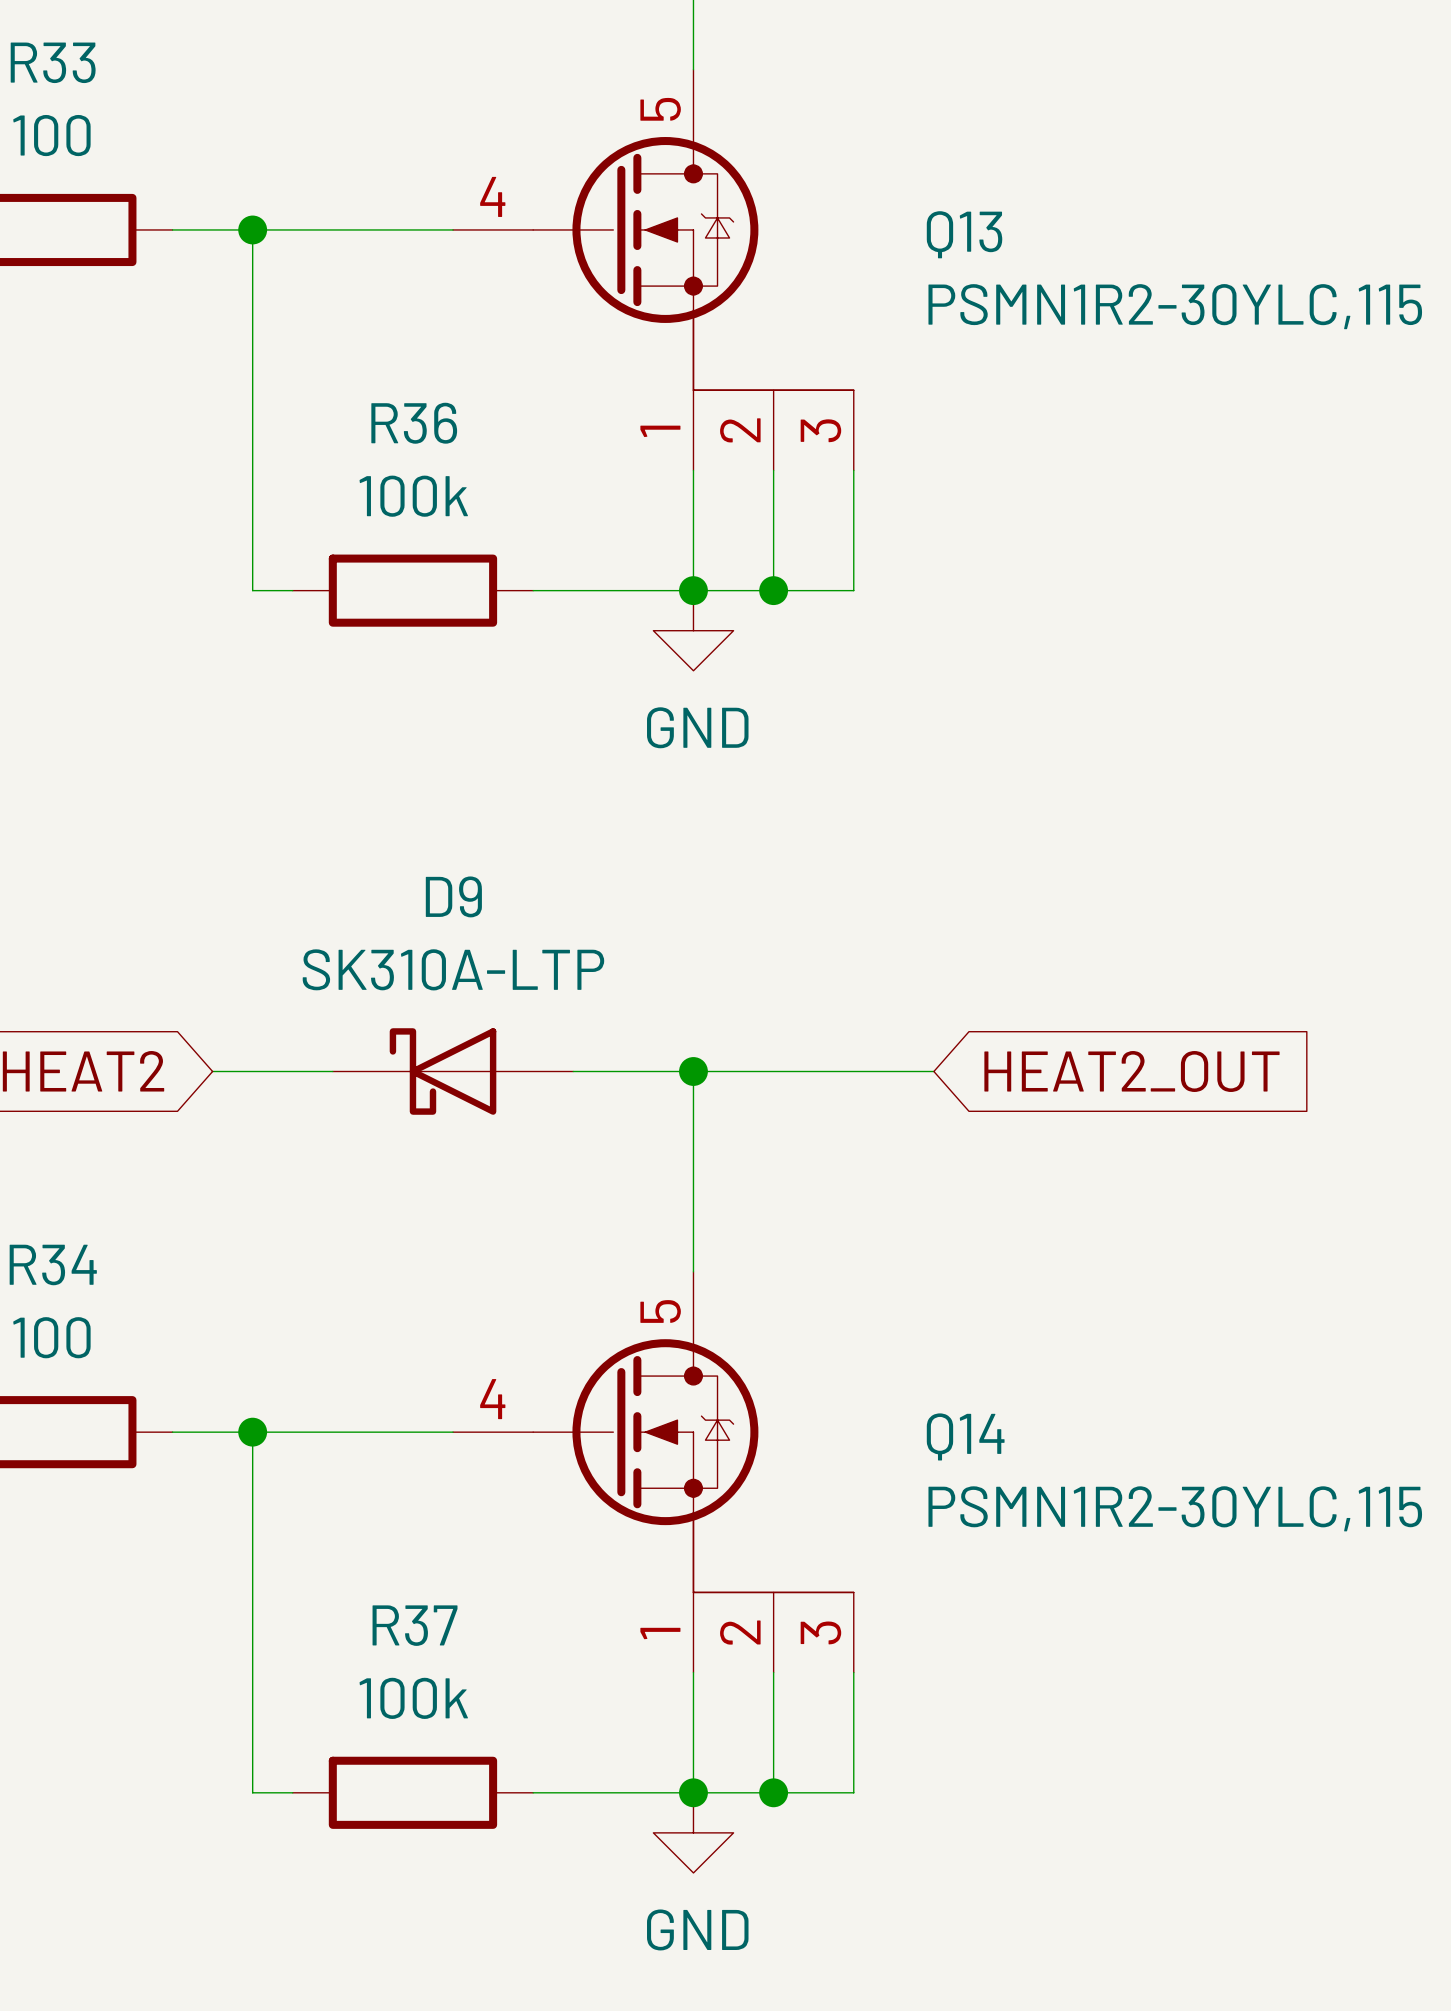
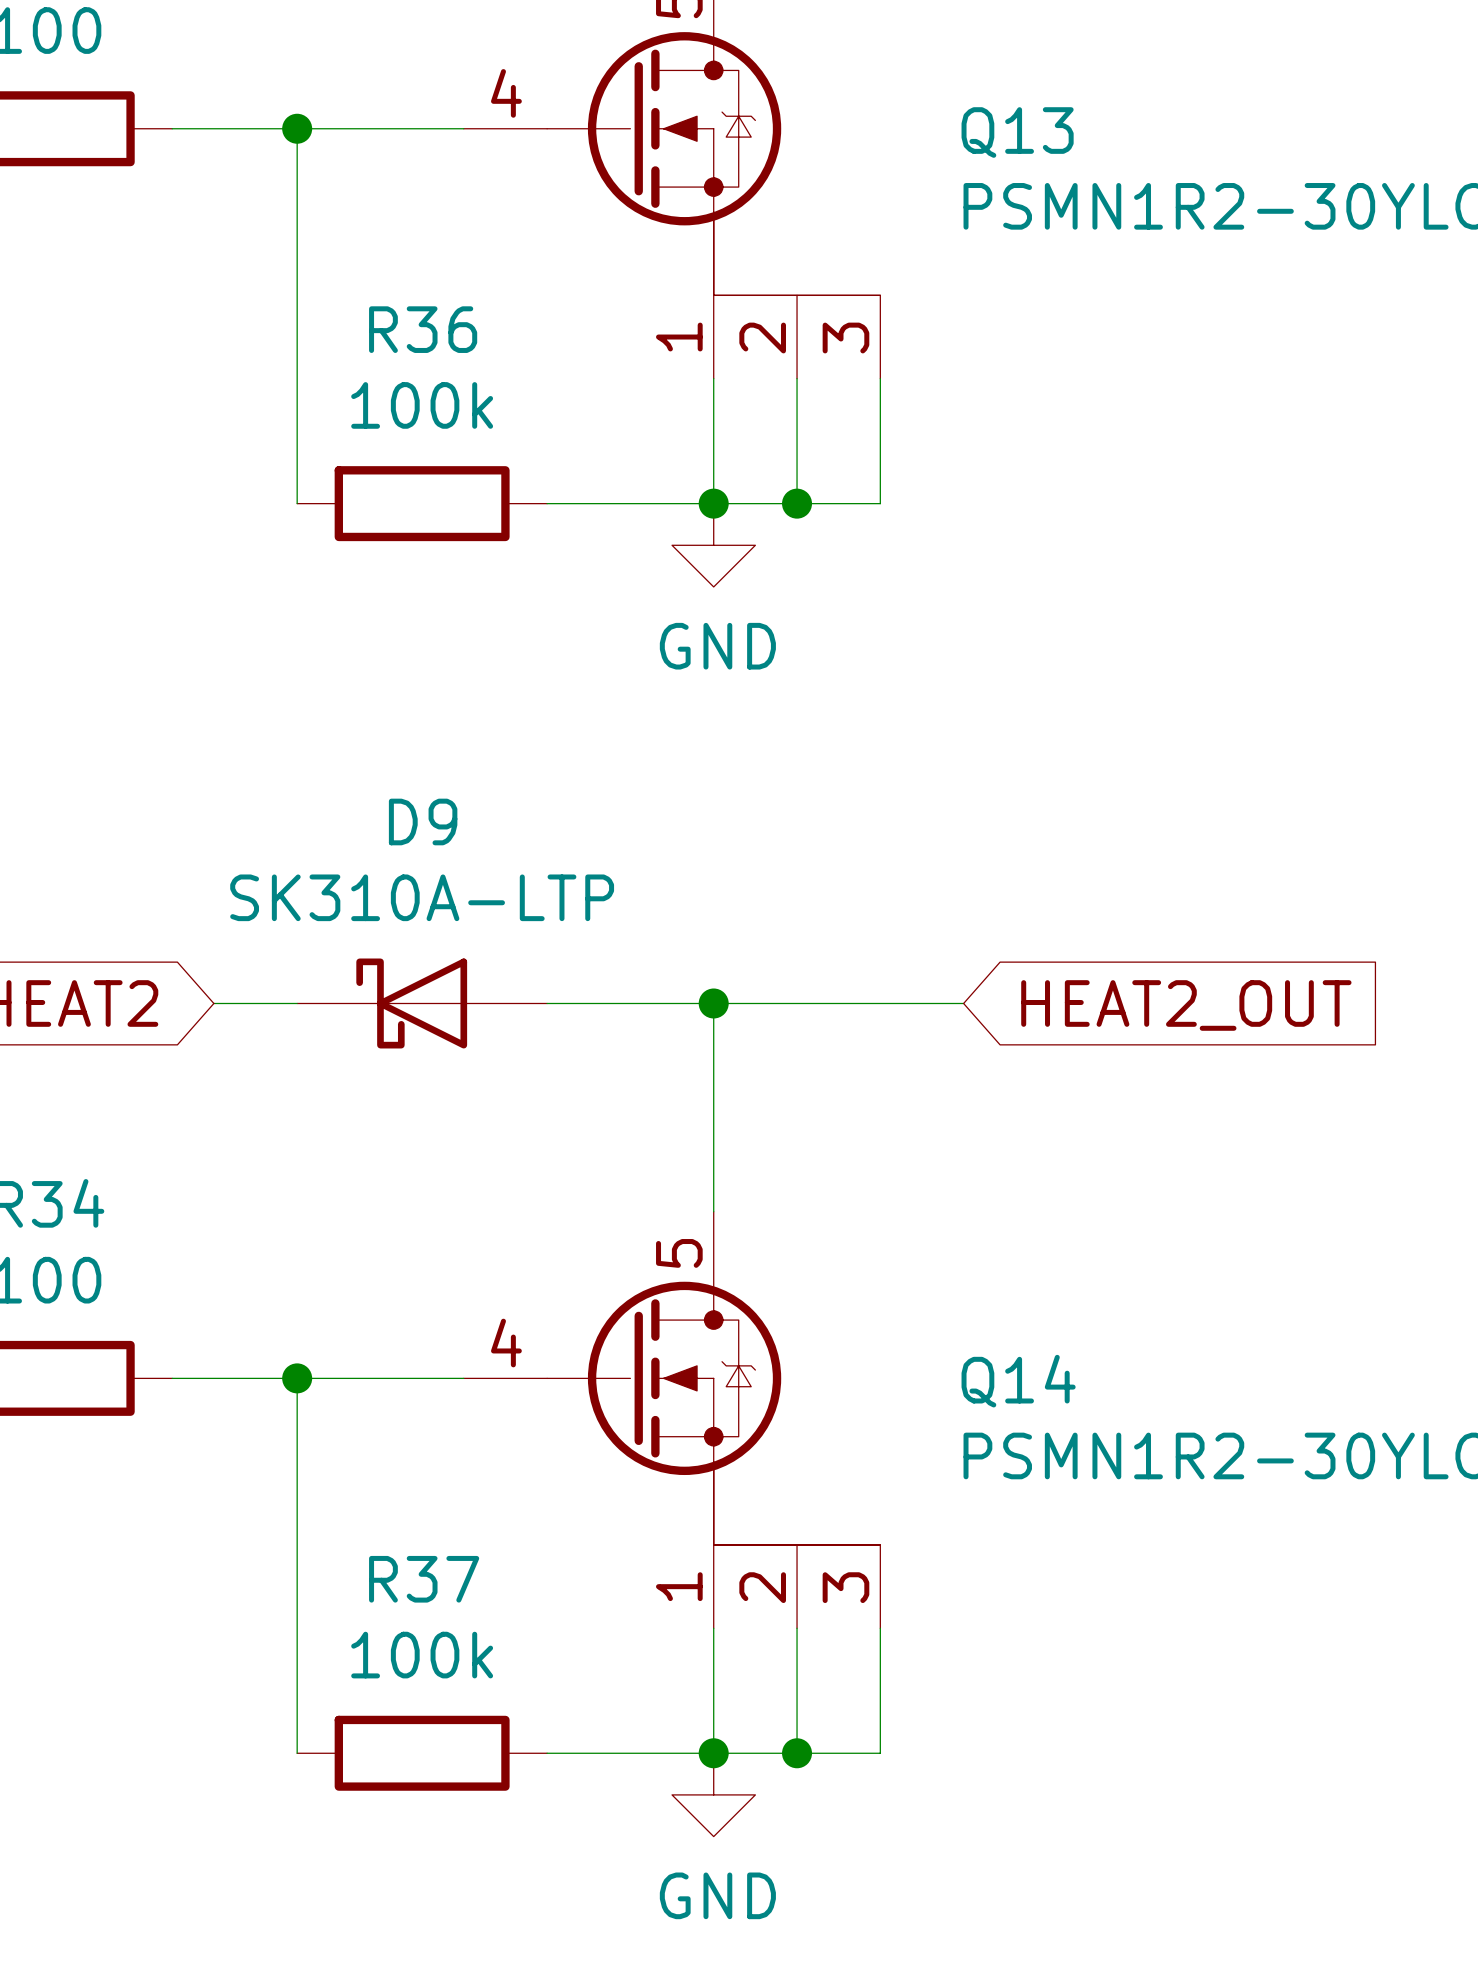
wire: (252, 229) (252, 590) (292, 590) -> (297, 128) (297, 503)
junction position: (252, 229) -> (297, 128)
D9 position: (453, 1071) -> (422, 1003)
wire: (252, 1432) (252, 1792) (292, 1792) -> (297, 1378) (297, 1753)
junction position: (252, 1432) -> (297, 1378)

